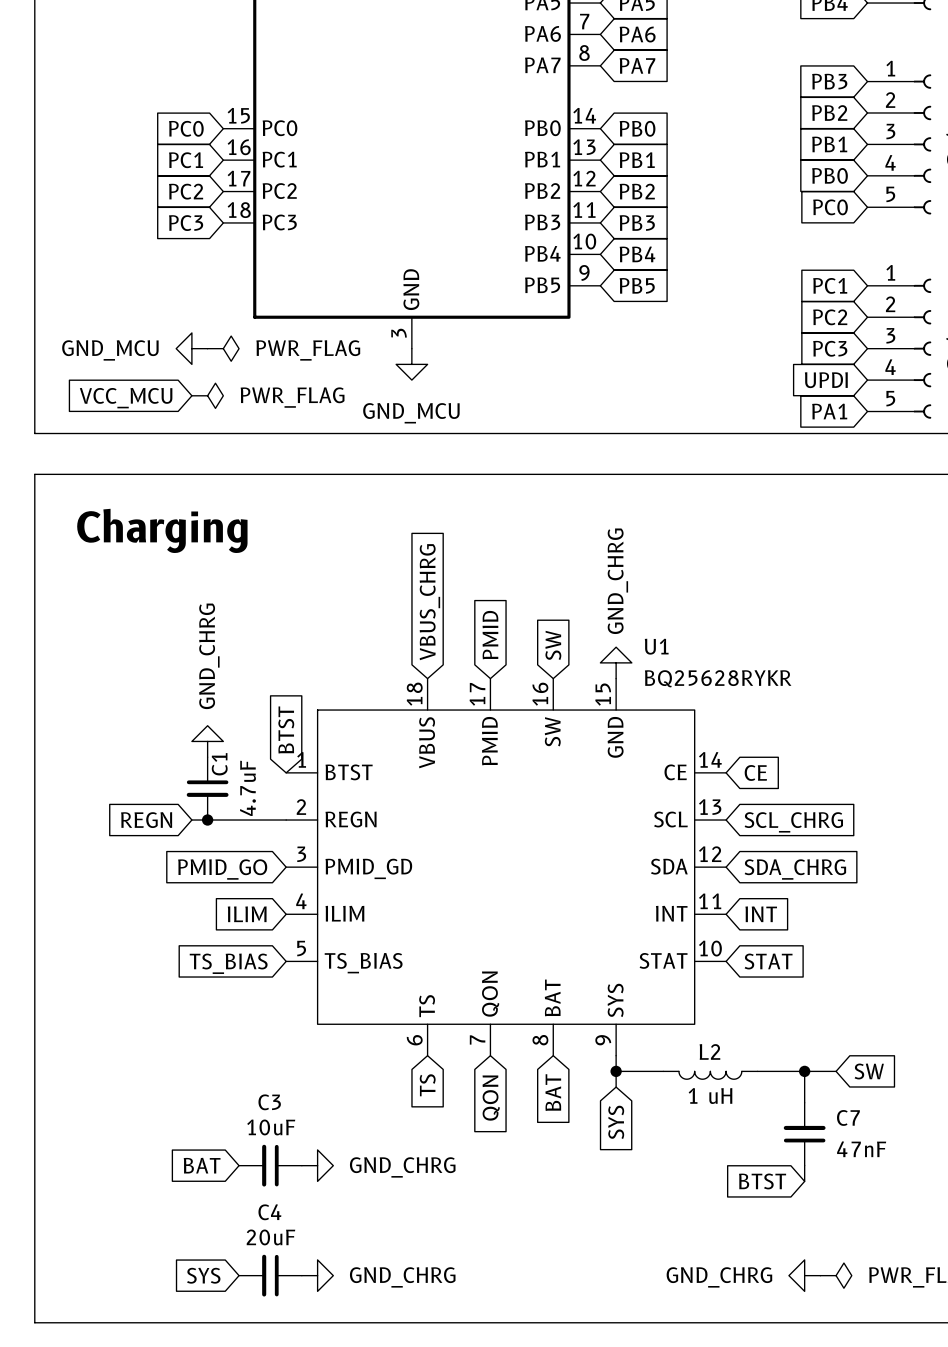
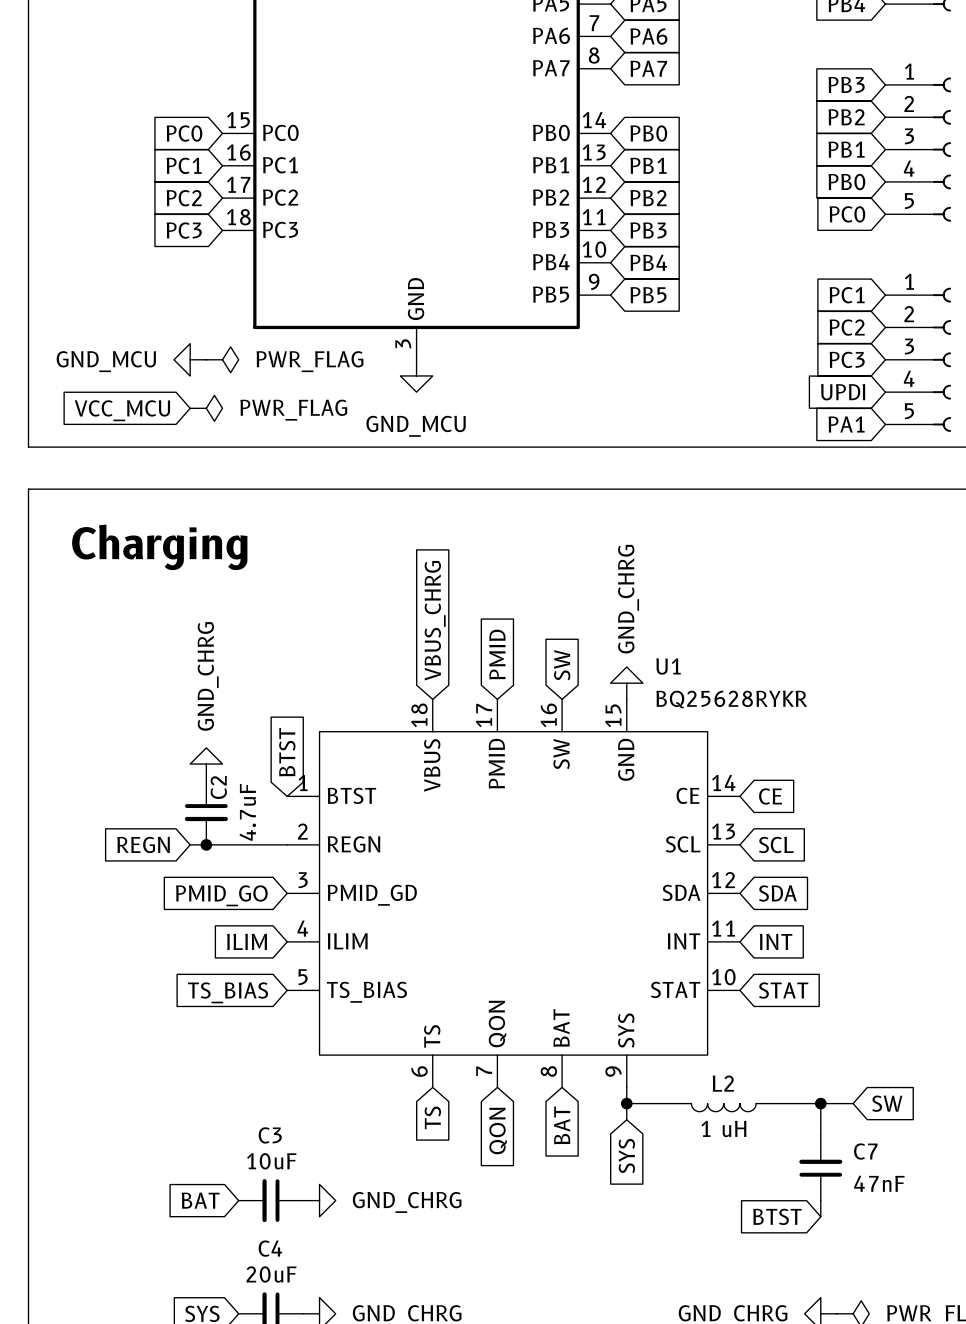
C1 name: C1 (219, 764) -> C2 (218, 787)
global label: SCL_CHRG (793, 822) -> SCL (776, 844)
global label: SDA_CHRG (795, 869) -> SDA (777, 893)

